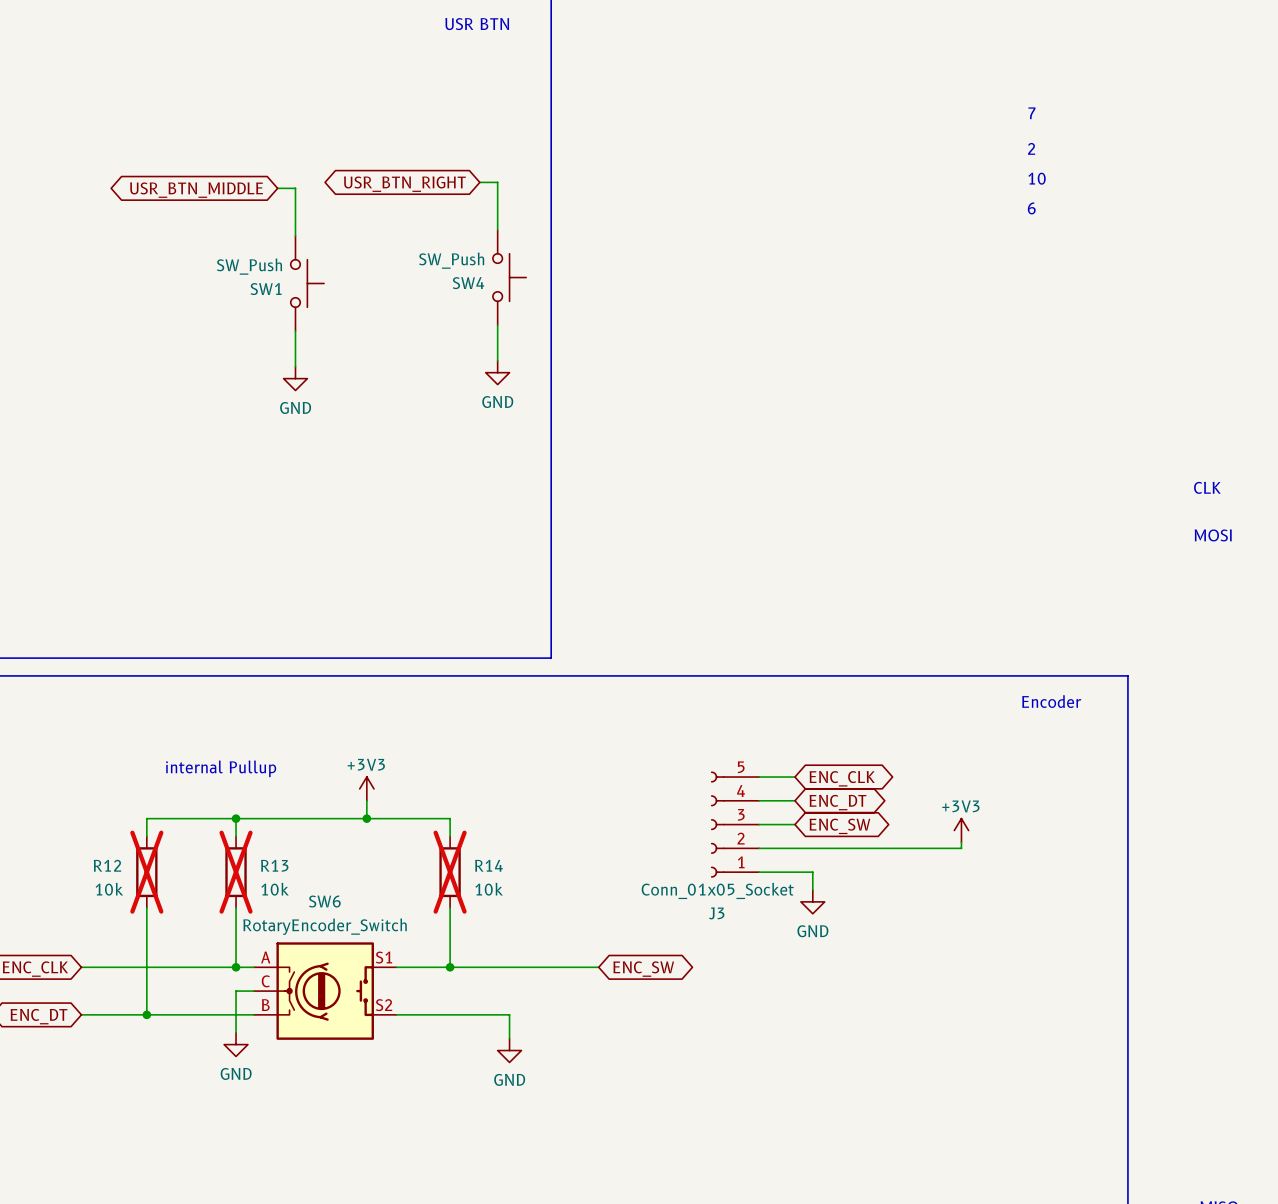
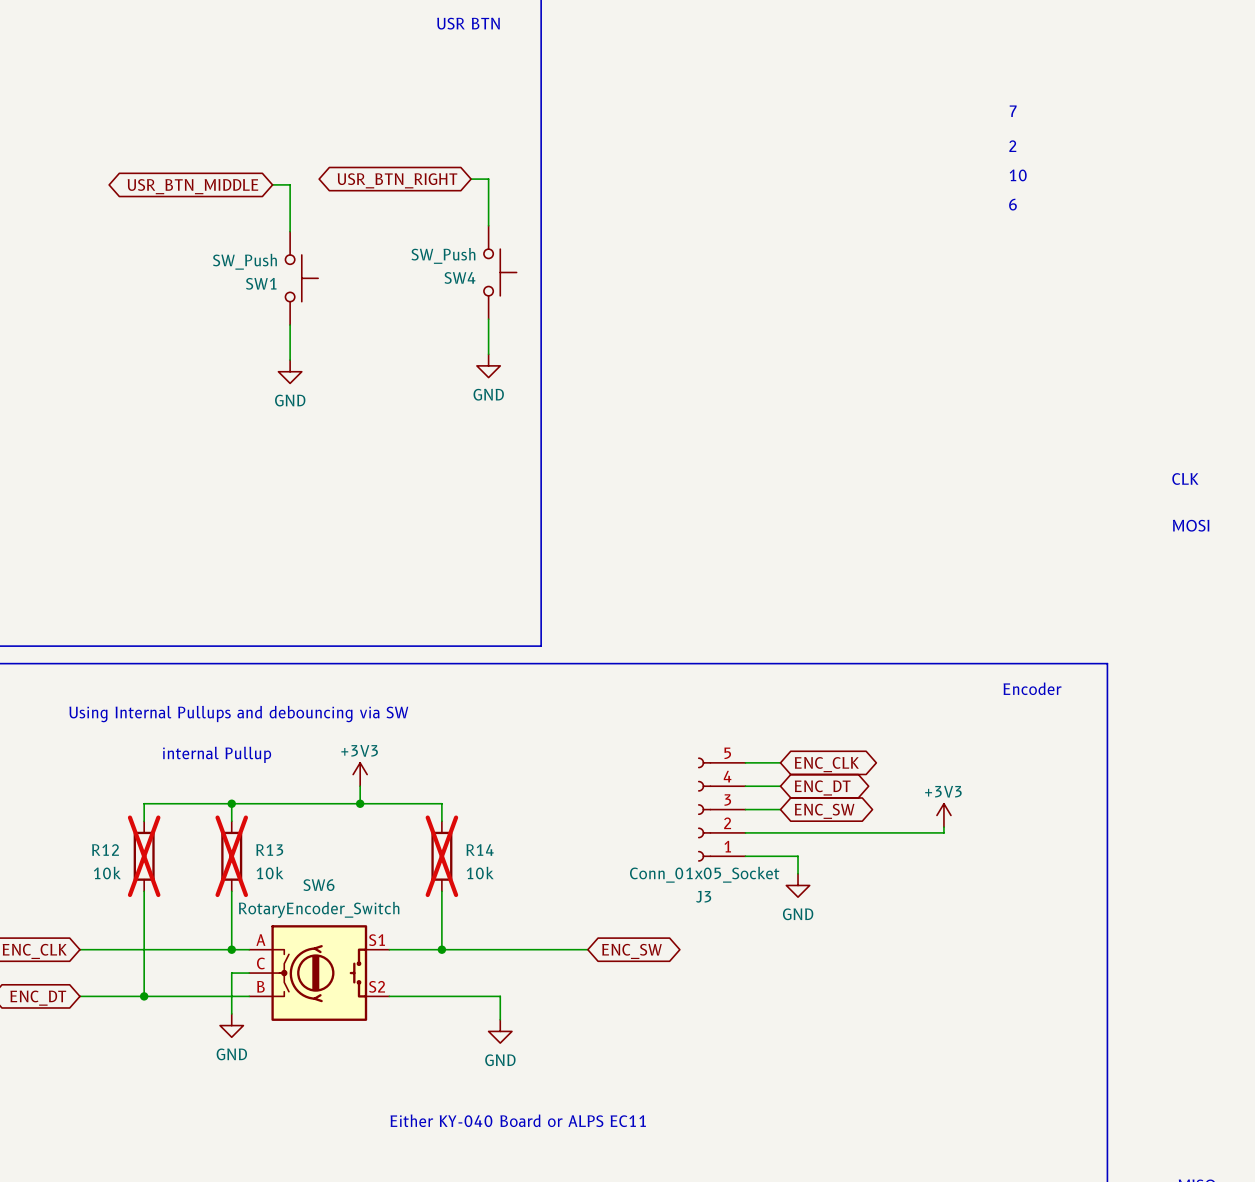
text: none -> Using Internal Pullups and debouncing via SW (238, 714)
text: none -> Either KY-040 Board or ALPS EC11 (518, 1120)

